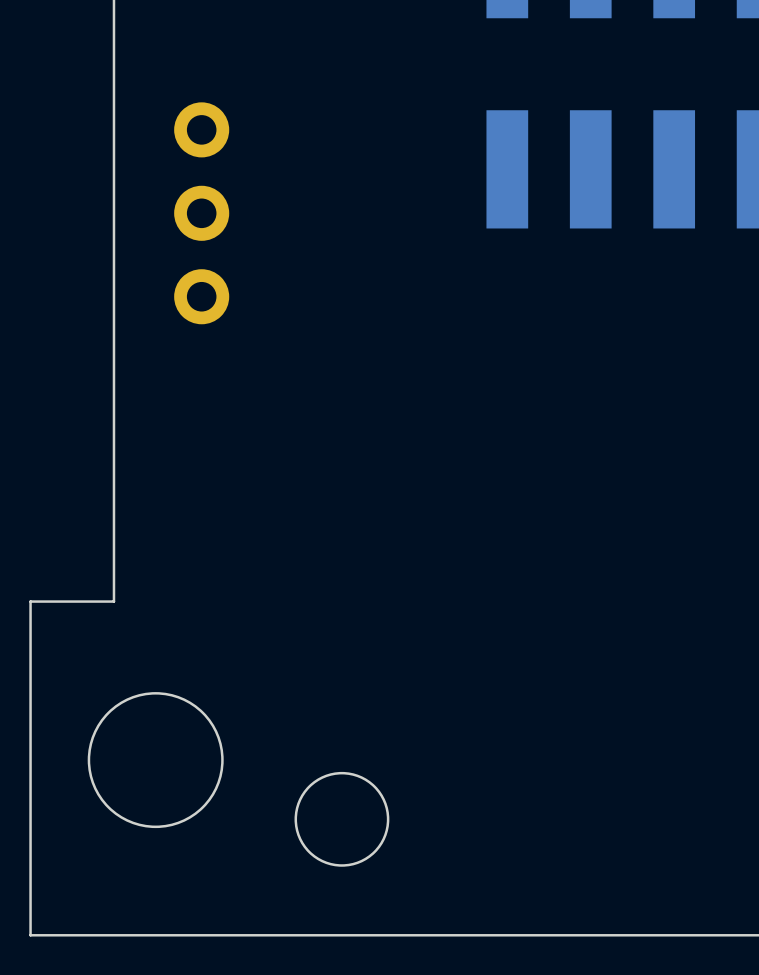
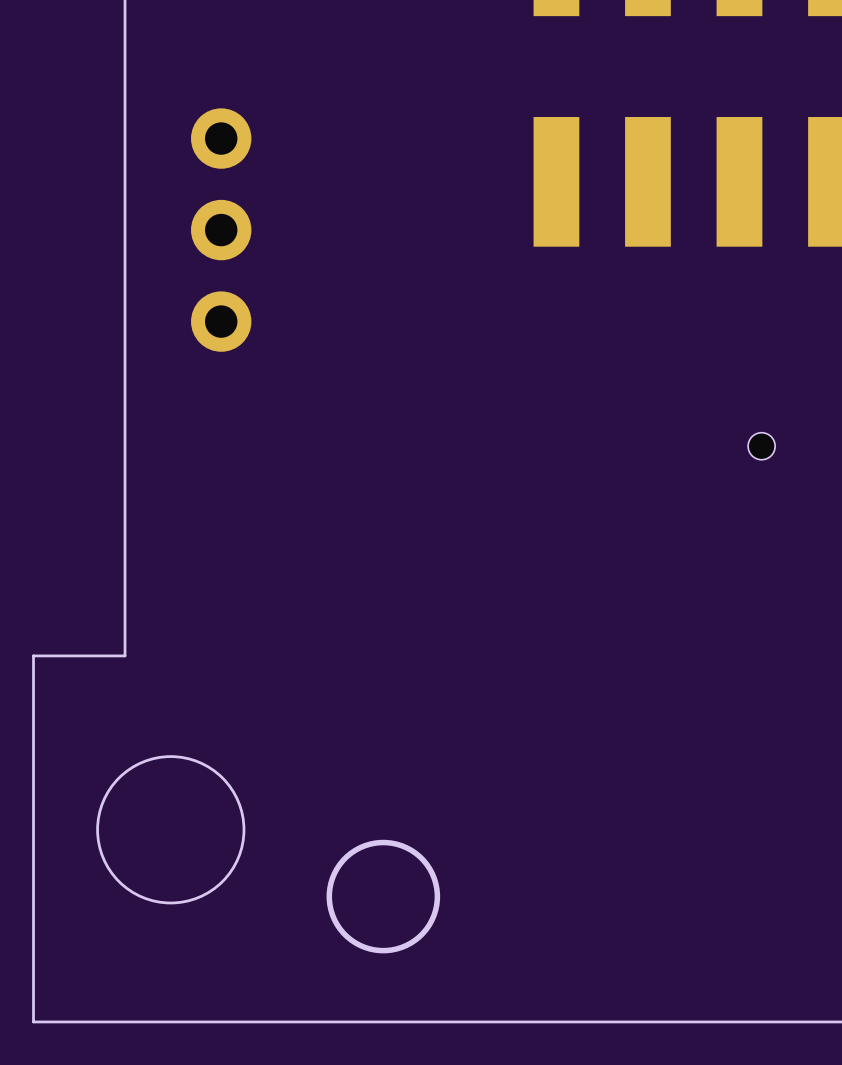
hole: none -> (761, 446)
round board edge size: [294, 771, 390, 867] -> [326, 839, 441, 954]

